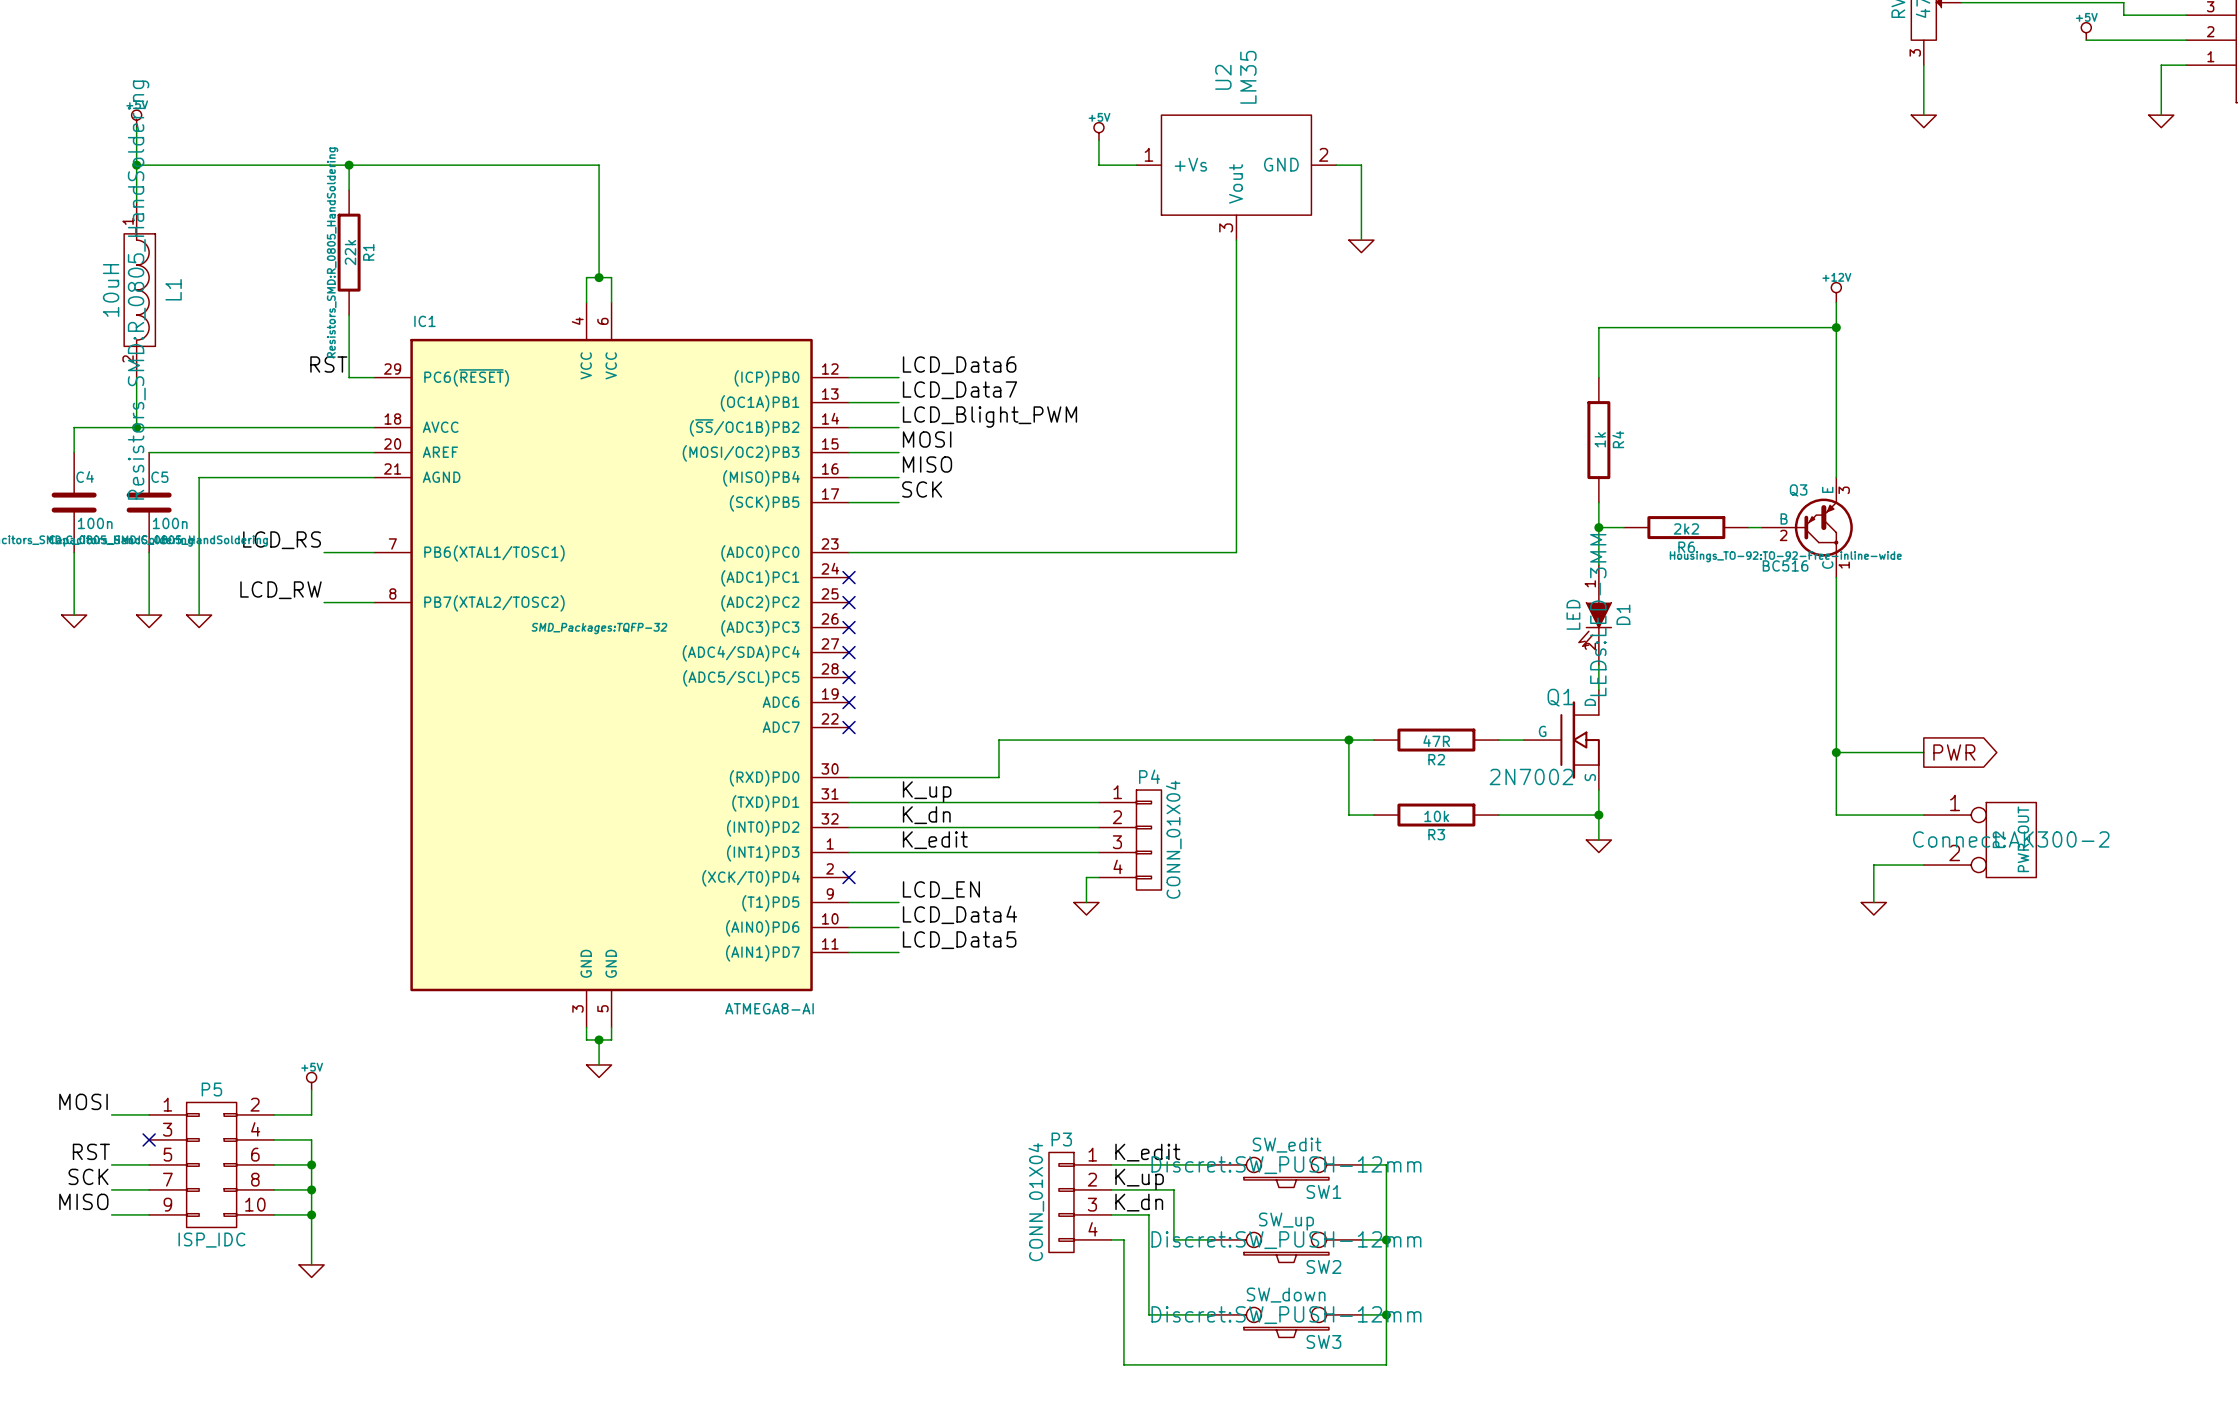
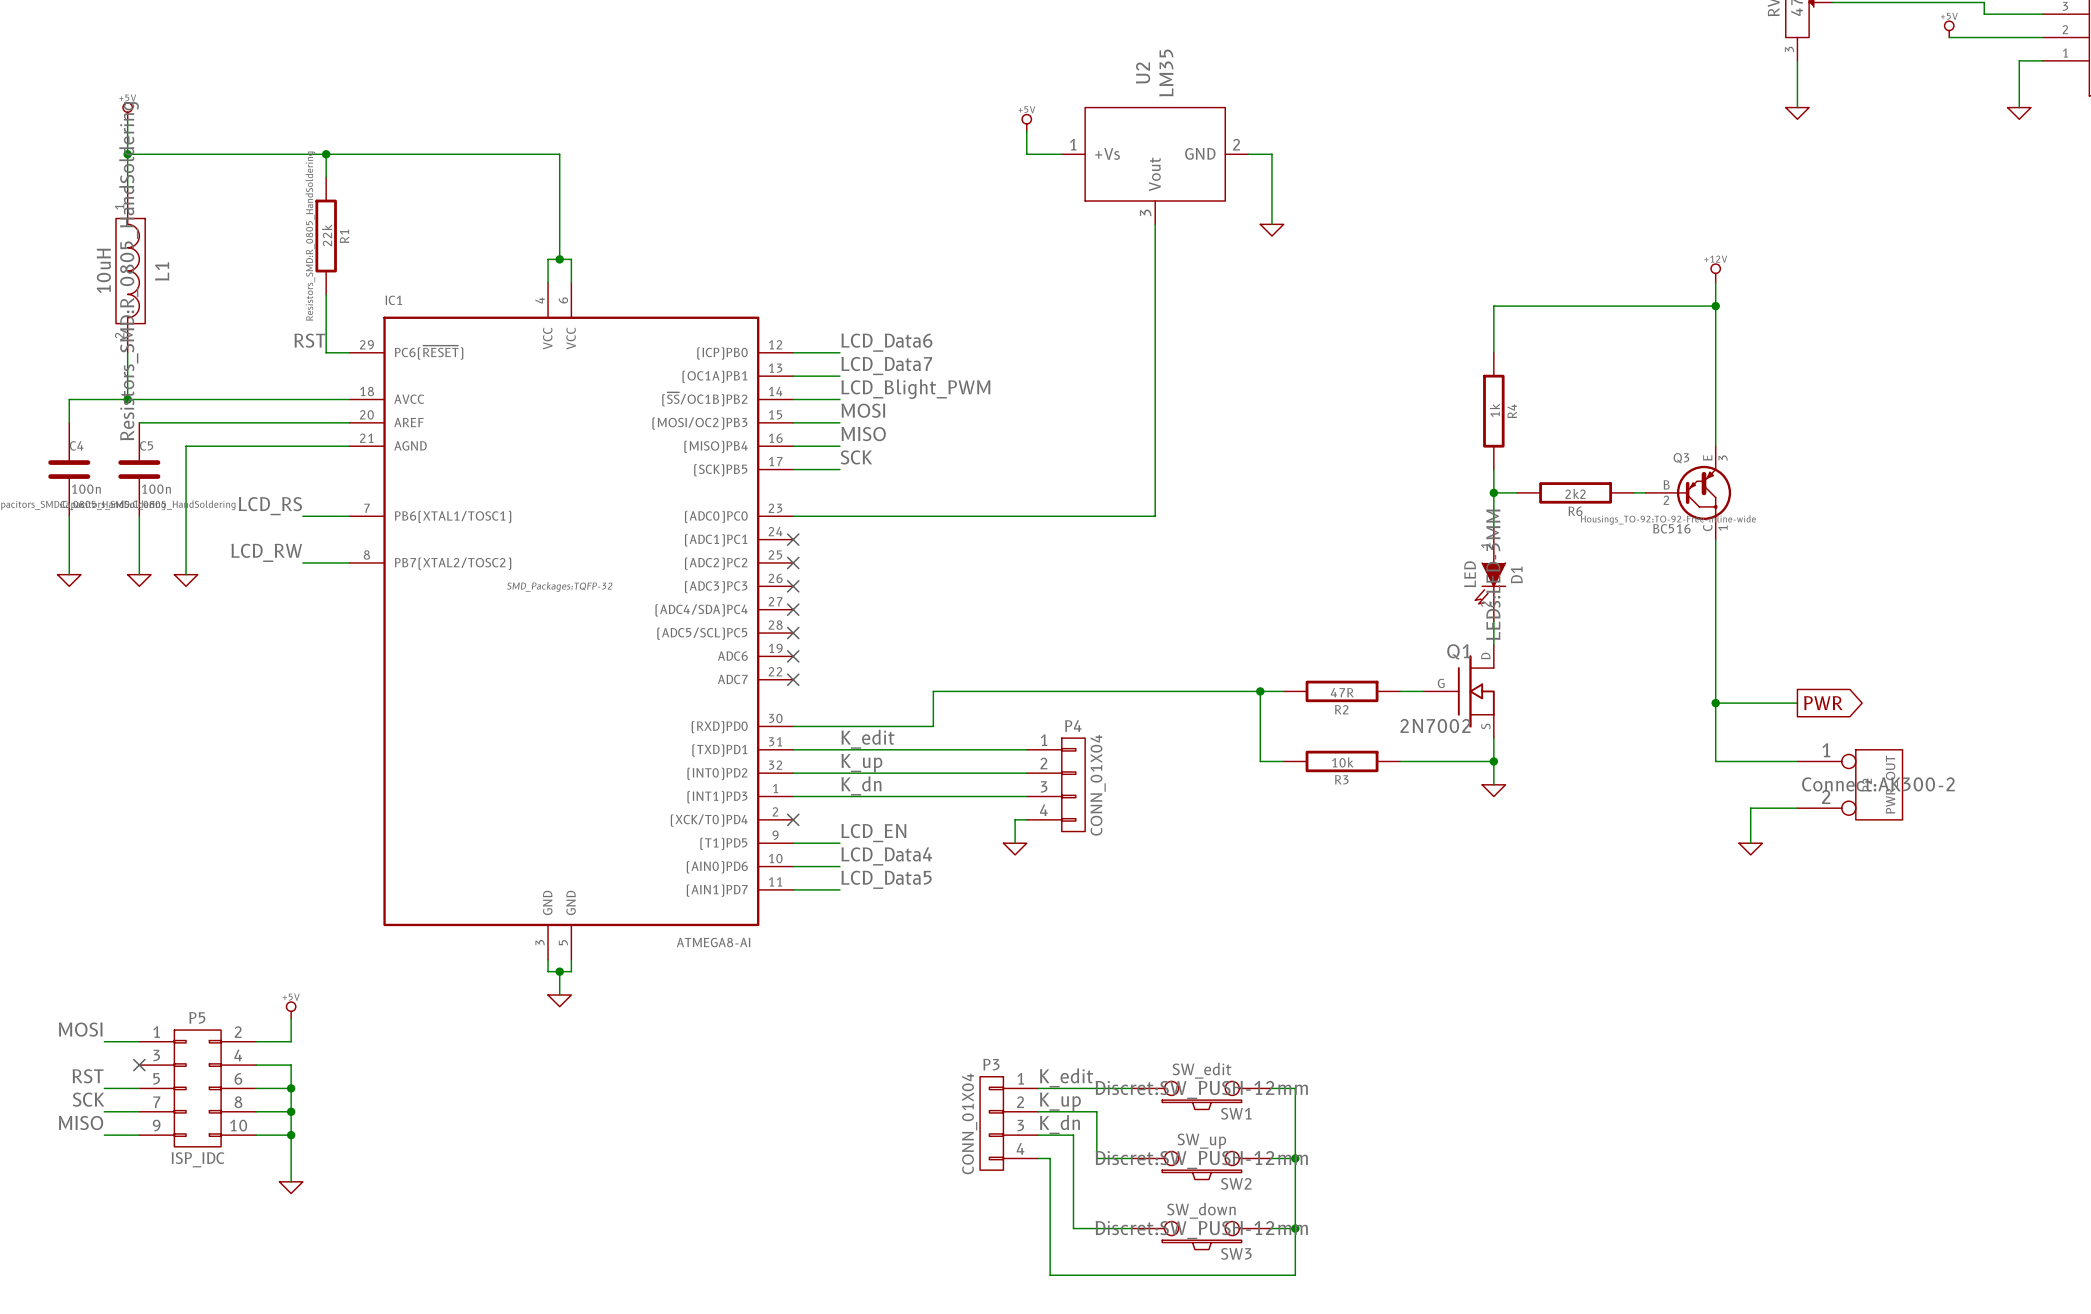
label: K_up (927, 791) -> K_edit (867, 739)
label: K_dn (926, 815) -> K_up (861, 763)
label: K_edit (935, 840) -> K_dn (861, 785)

